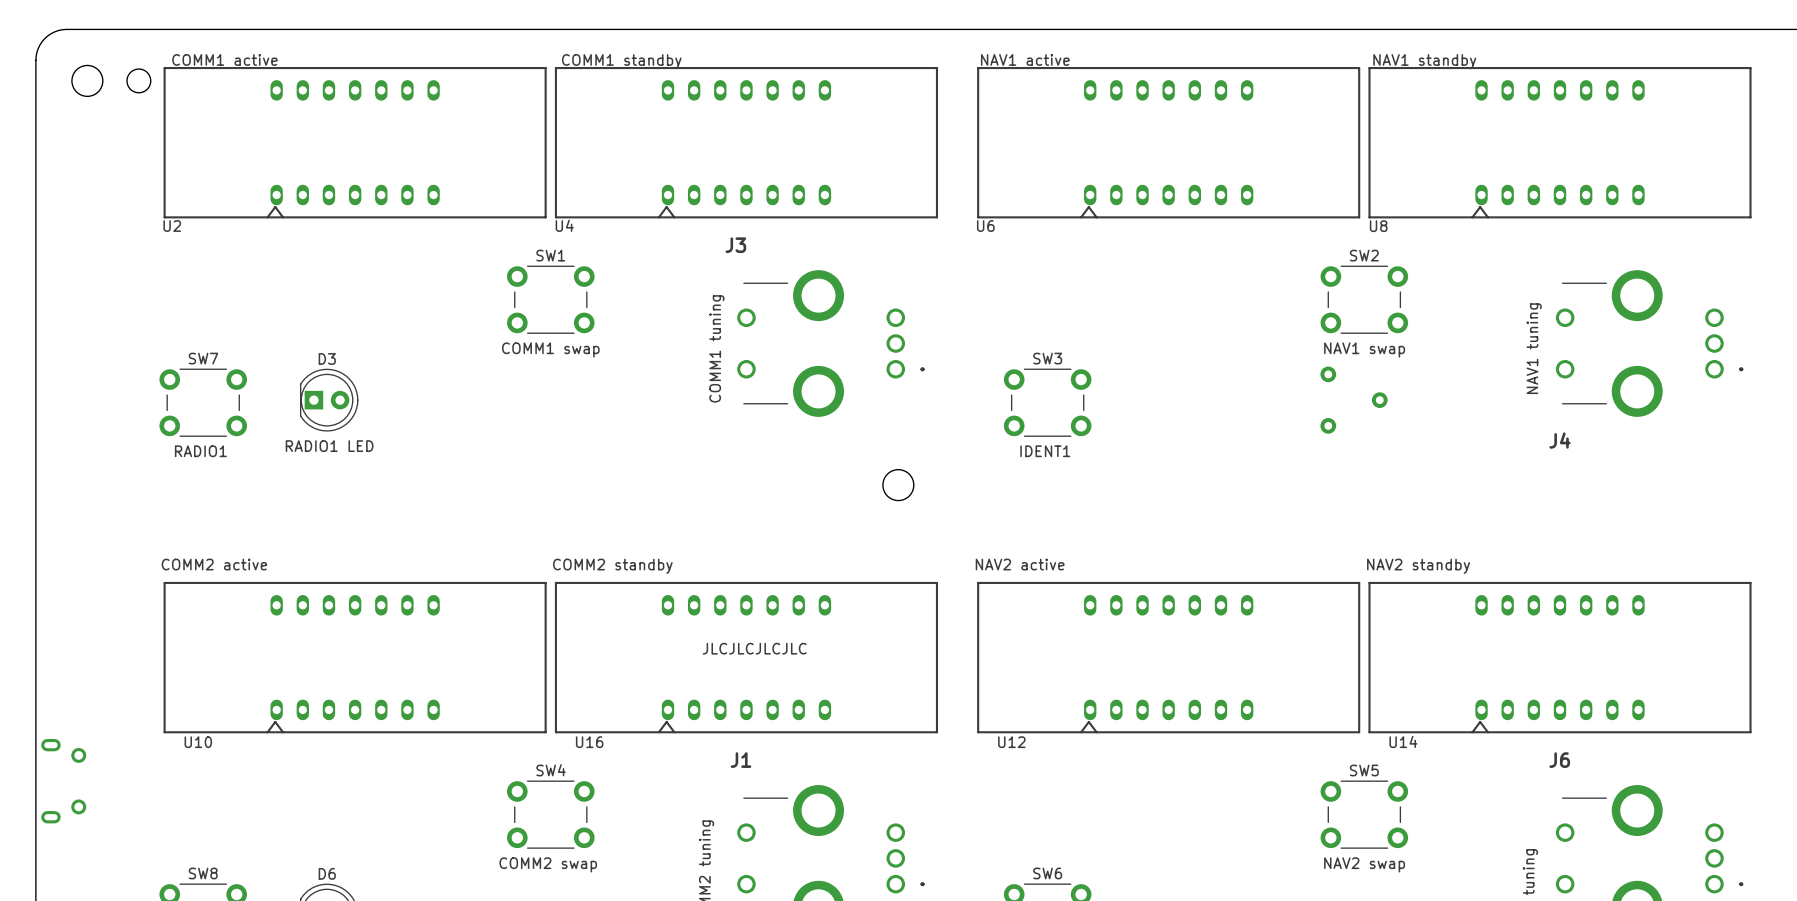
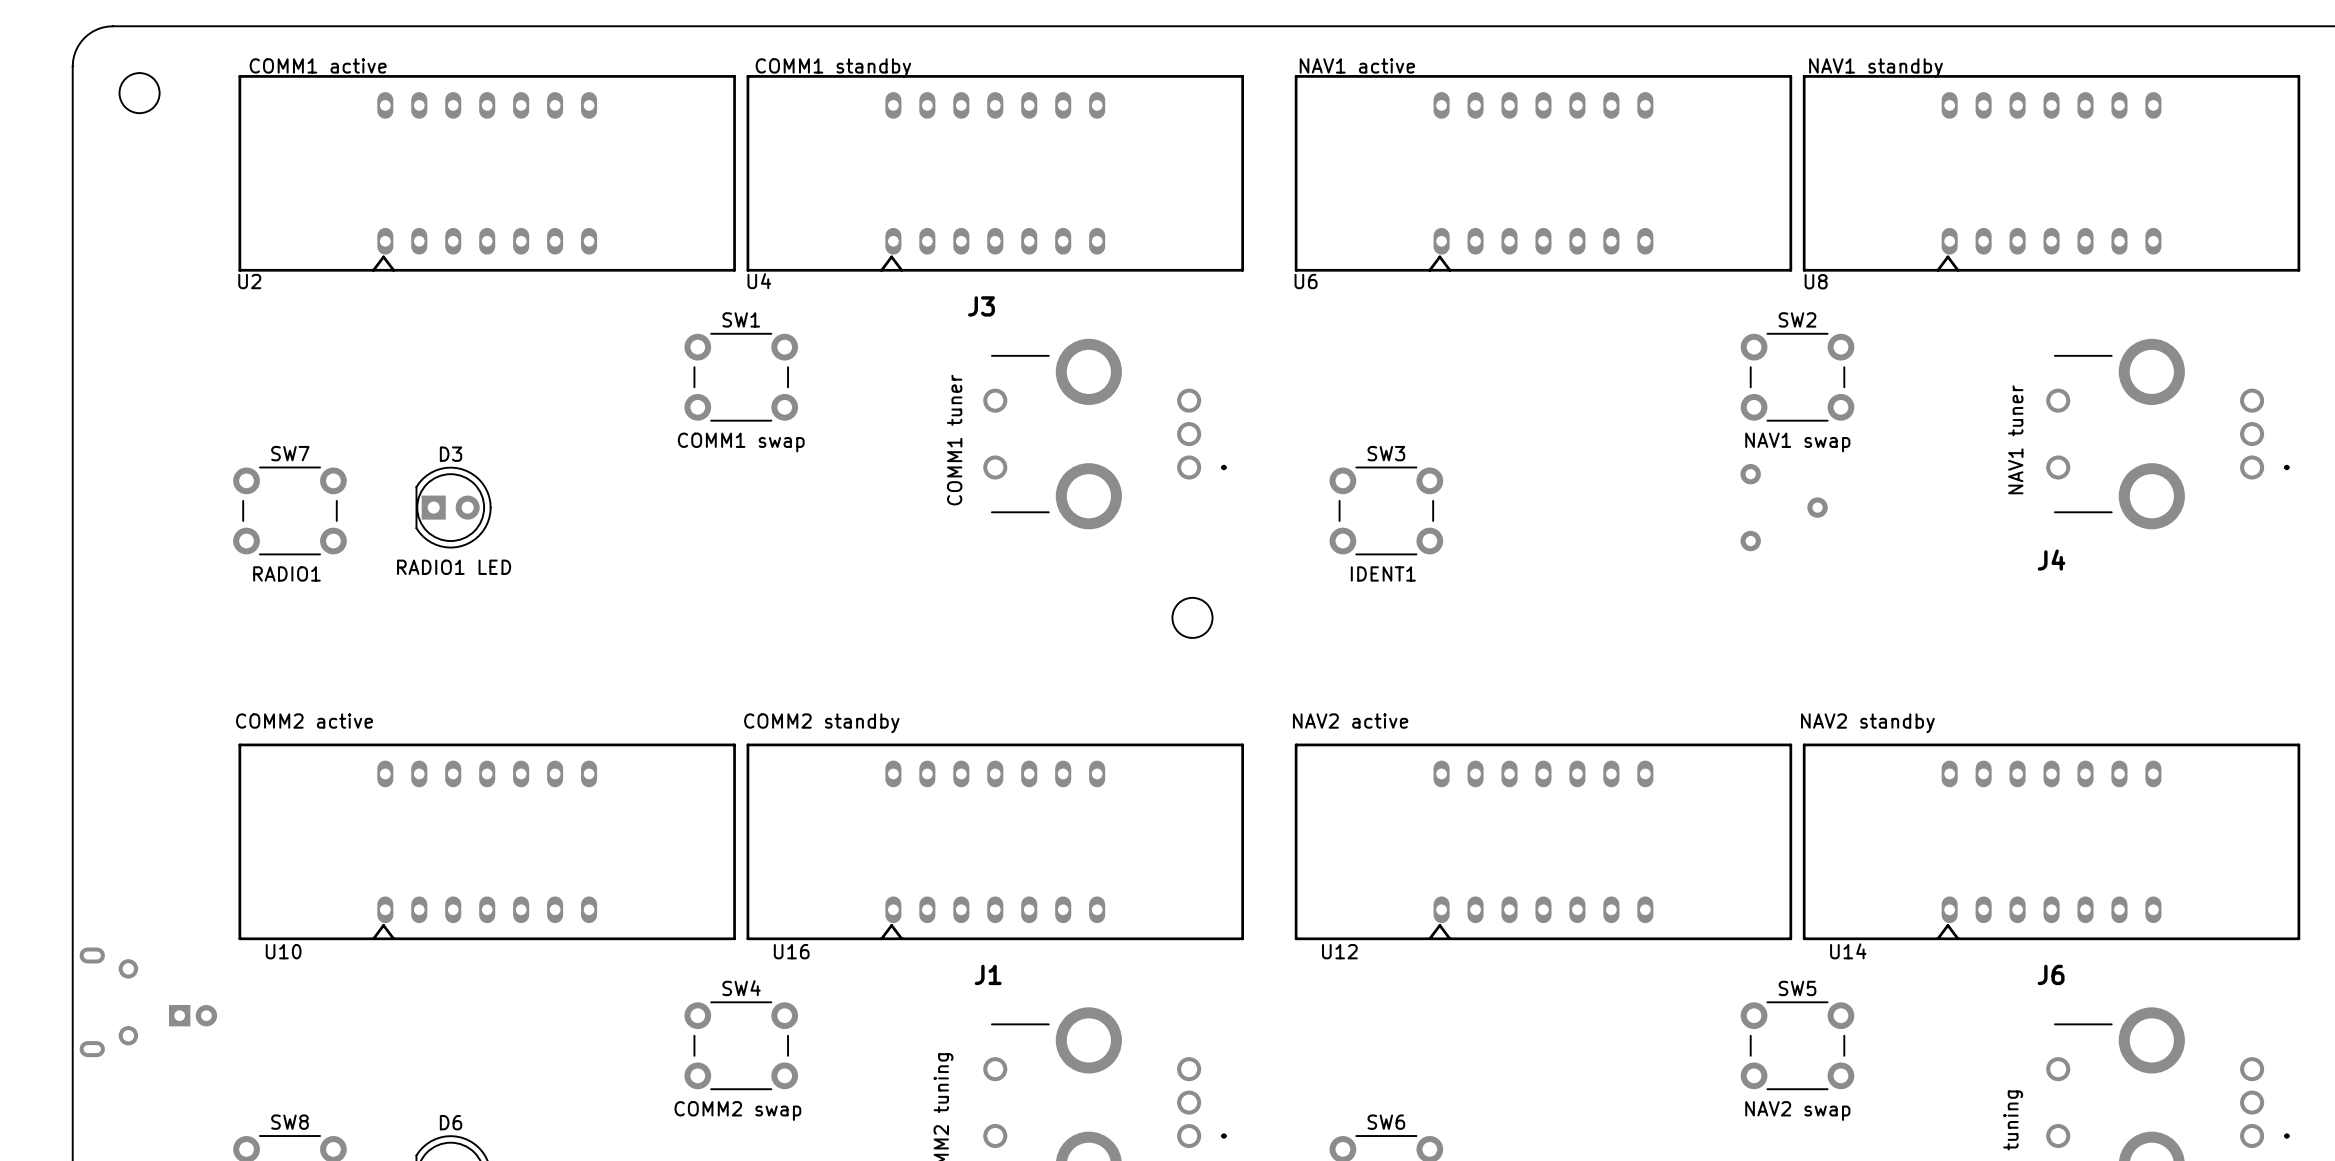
round board edge: [126, 68, 151, 94] -> none
text: COMM1 tuning (716, 348) -> COMM1 tuner (954, 440)
text: NAV1 tuning (1534, 348) -> NAV1 tuner (2015, 439)
text: JLCJLCJLCJLC (754, 648) -> none
part: none -> (193, 1015)

